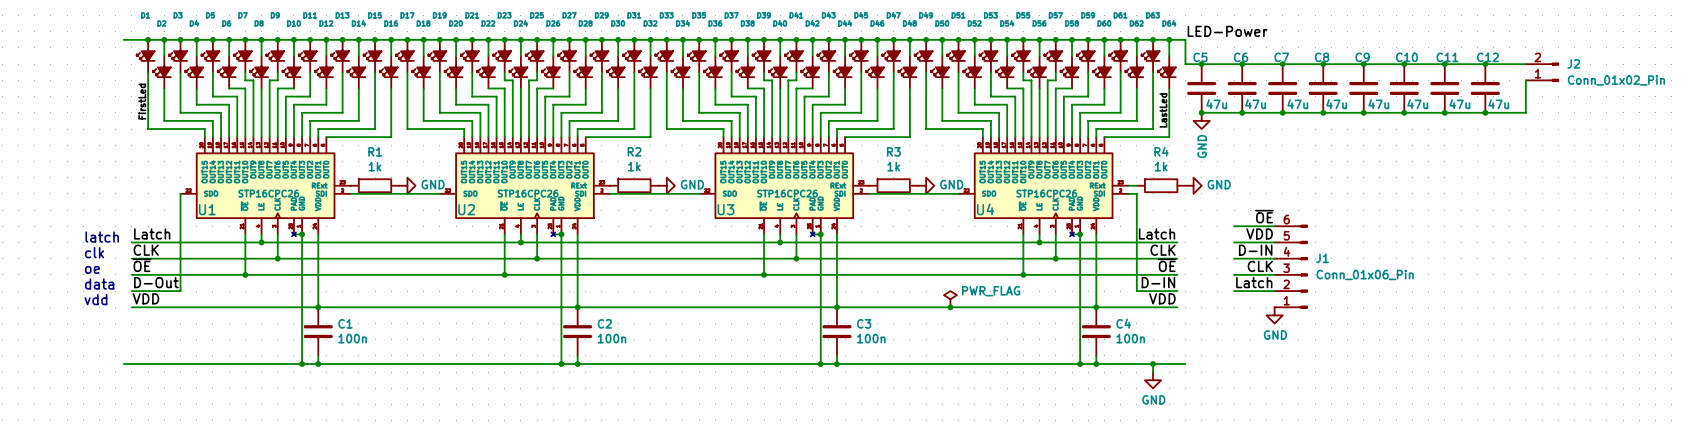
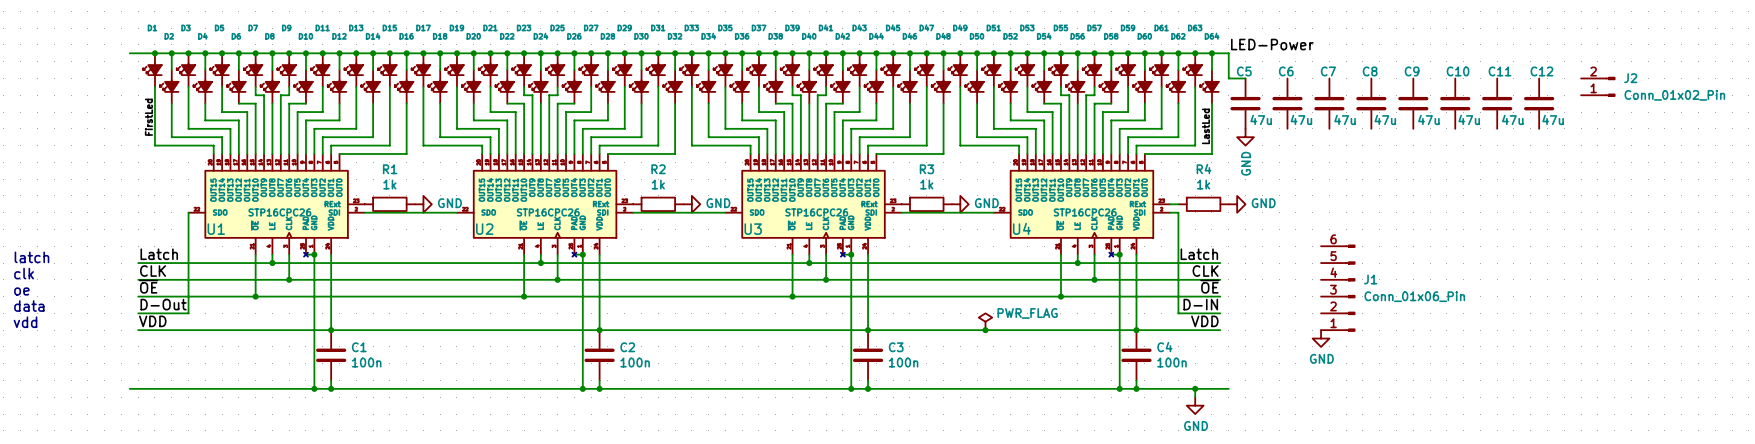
wire: (1201, 64) (1525, 64) -> none
junction: (1201, 64) -> none
junction: (1242, 64) -> none
junction: (1282, 64) -> none
junction: (1323, 64) -> none
junction: (1363, 64) -> none
junction: (1404, 64) -> none
junction: (1444, 64) -> none
junction: (1485, 64) -> none
wire: (1525, 80) (1525, 112) (1201, 112) -> none
junction: (1201, 112) -> none
junction: (1242, 112) -> none
junction: (1282, 112) -> none
junction: (1323, 112) -> none
junction: (1363, 112) -> none
junction: (1404, 112) -> none
junction: (1444, 112) -> none
junction: (1485, 112) -> none
label: ~{OE} (1264, 216) -> none
wire: (1234, 226) (1274, 226) -> none
label: VDD (1259, 233) -> none
text position: latch (102, 237) -> latch (31, 257)
wire: (1234, 242) (1274, 242) -> none
label: D-IN (1255, 250) -> none
text position: clk (94, 252) -> clk (24, 273)
wire: (1234, 258) (1274, 258) -> none
label: CLK (1260, 266) -> none
text position: oe (92, 269) -> oe (21, 291)
wire: (1234, 274) (1274, 274) -> none
label: Latch (1254, 282) -> none
text position: data (99, 283) -> data (29, 306)
wire: (1234, 291) (1274, 291) -> none
text position: vdd (95, 299) -> vdd (25, 322)

